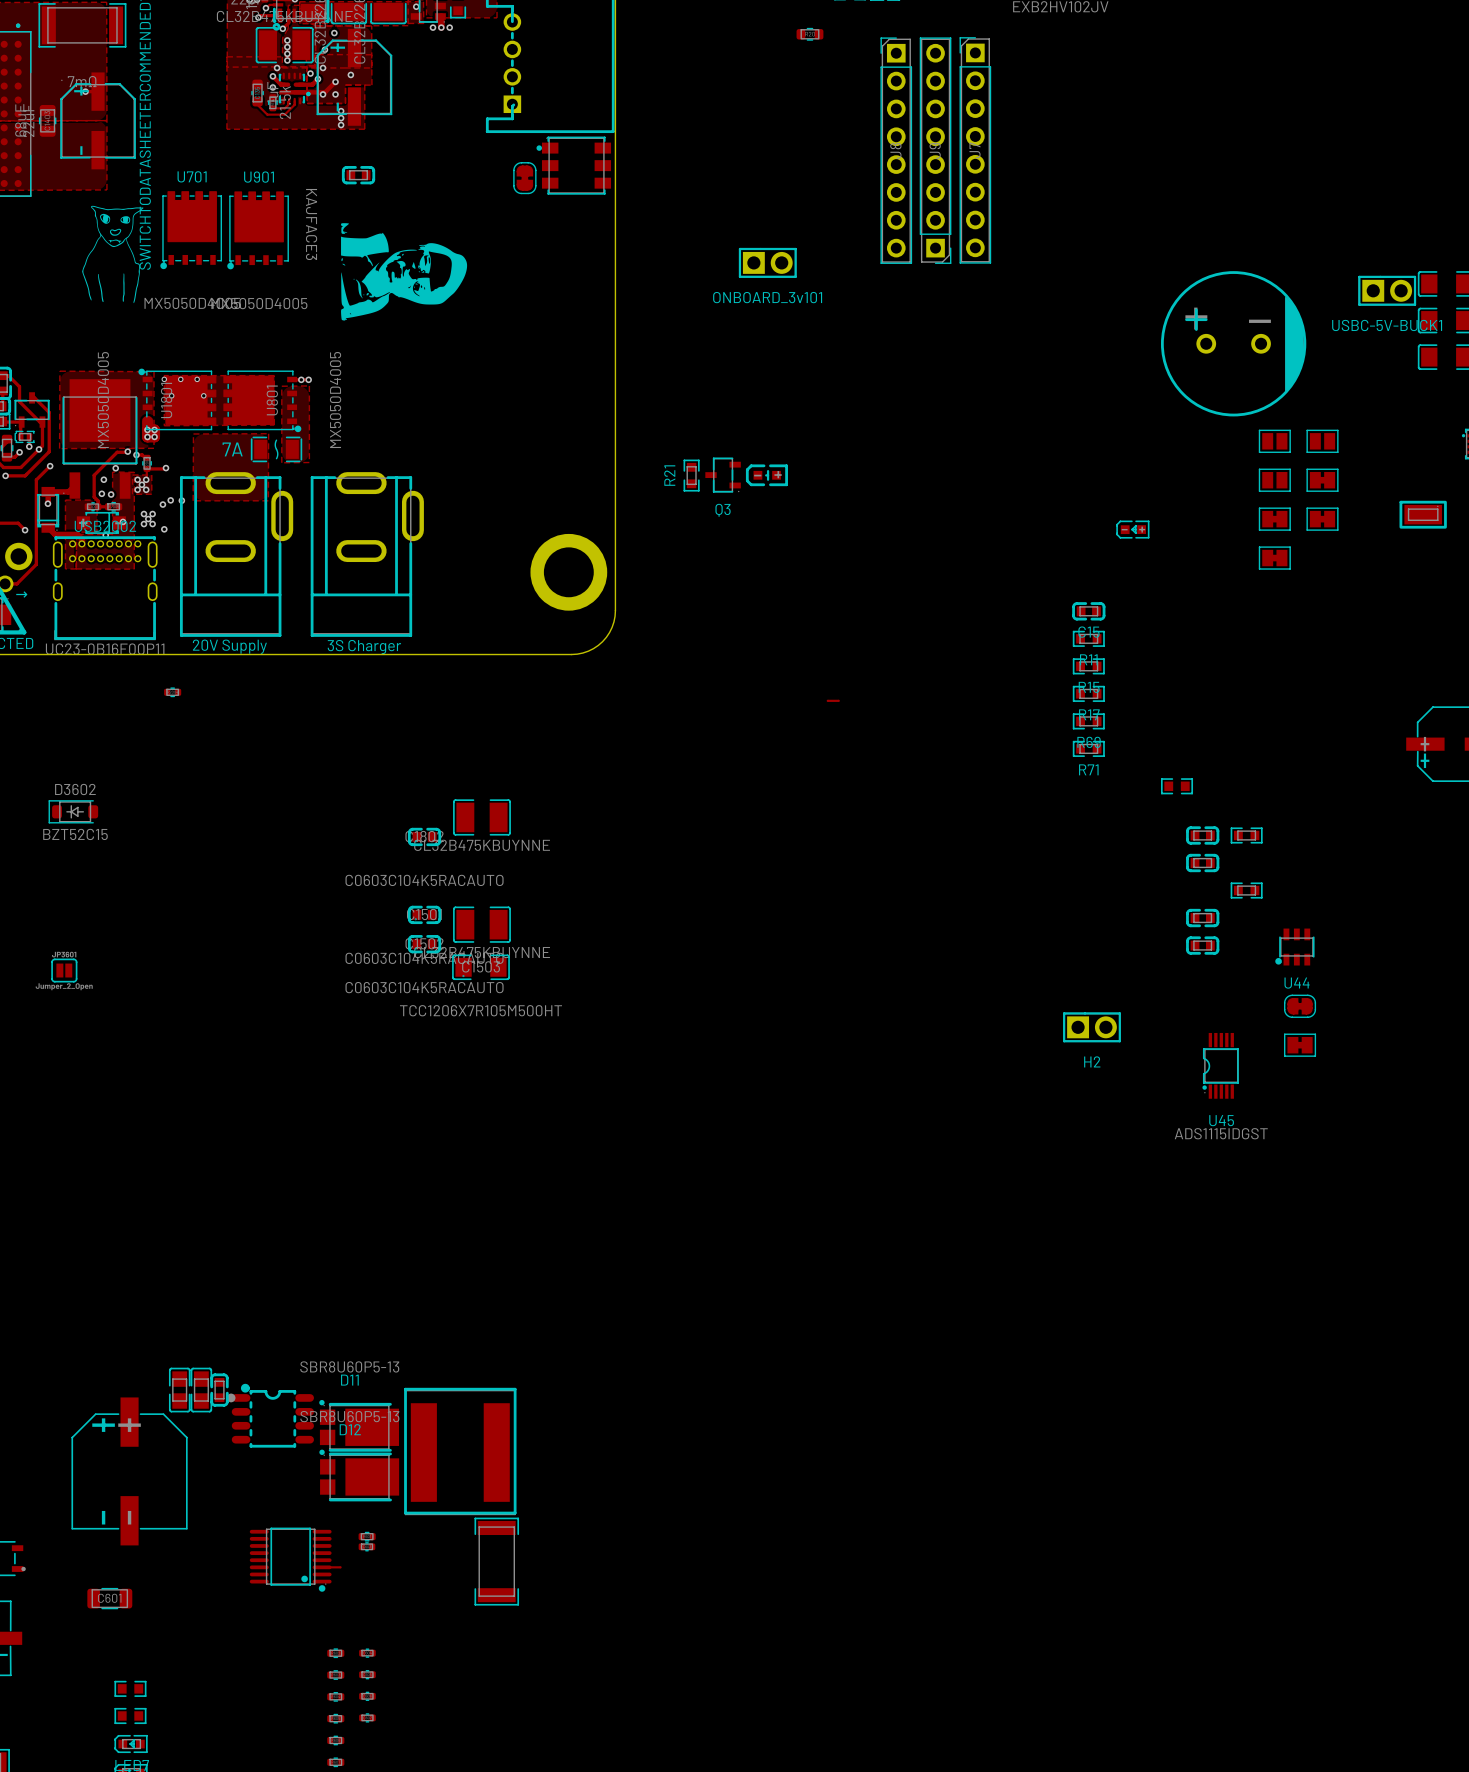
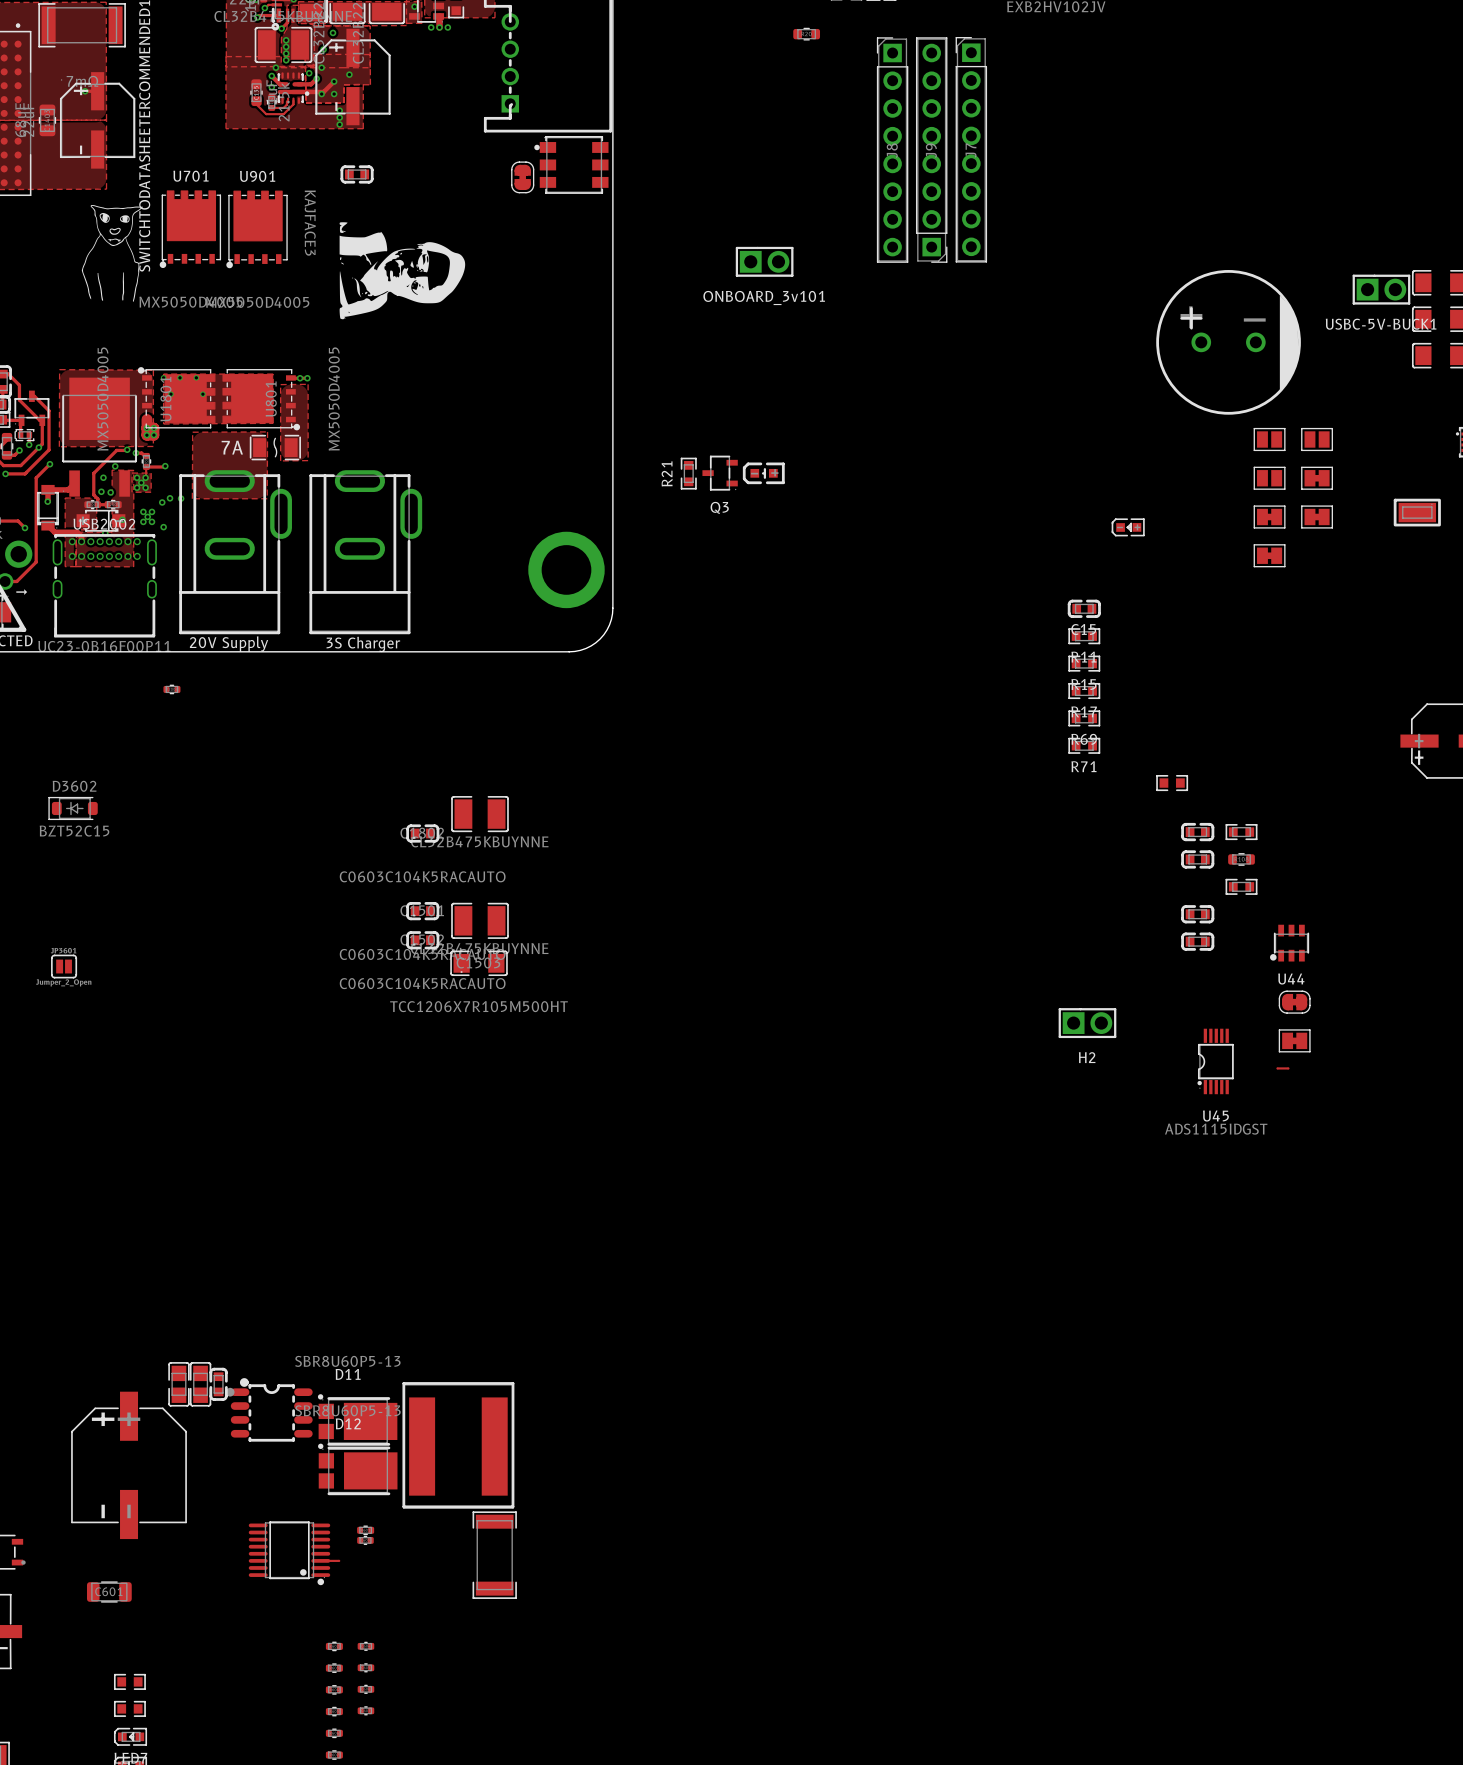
part: (833, 700) -> none
part: none -> (1241, 859)
part: none -> (1282, 1068)

